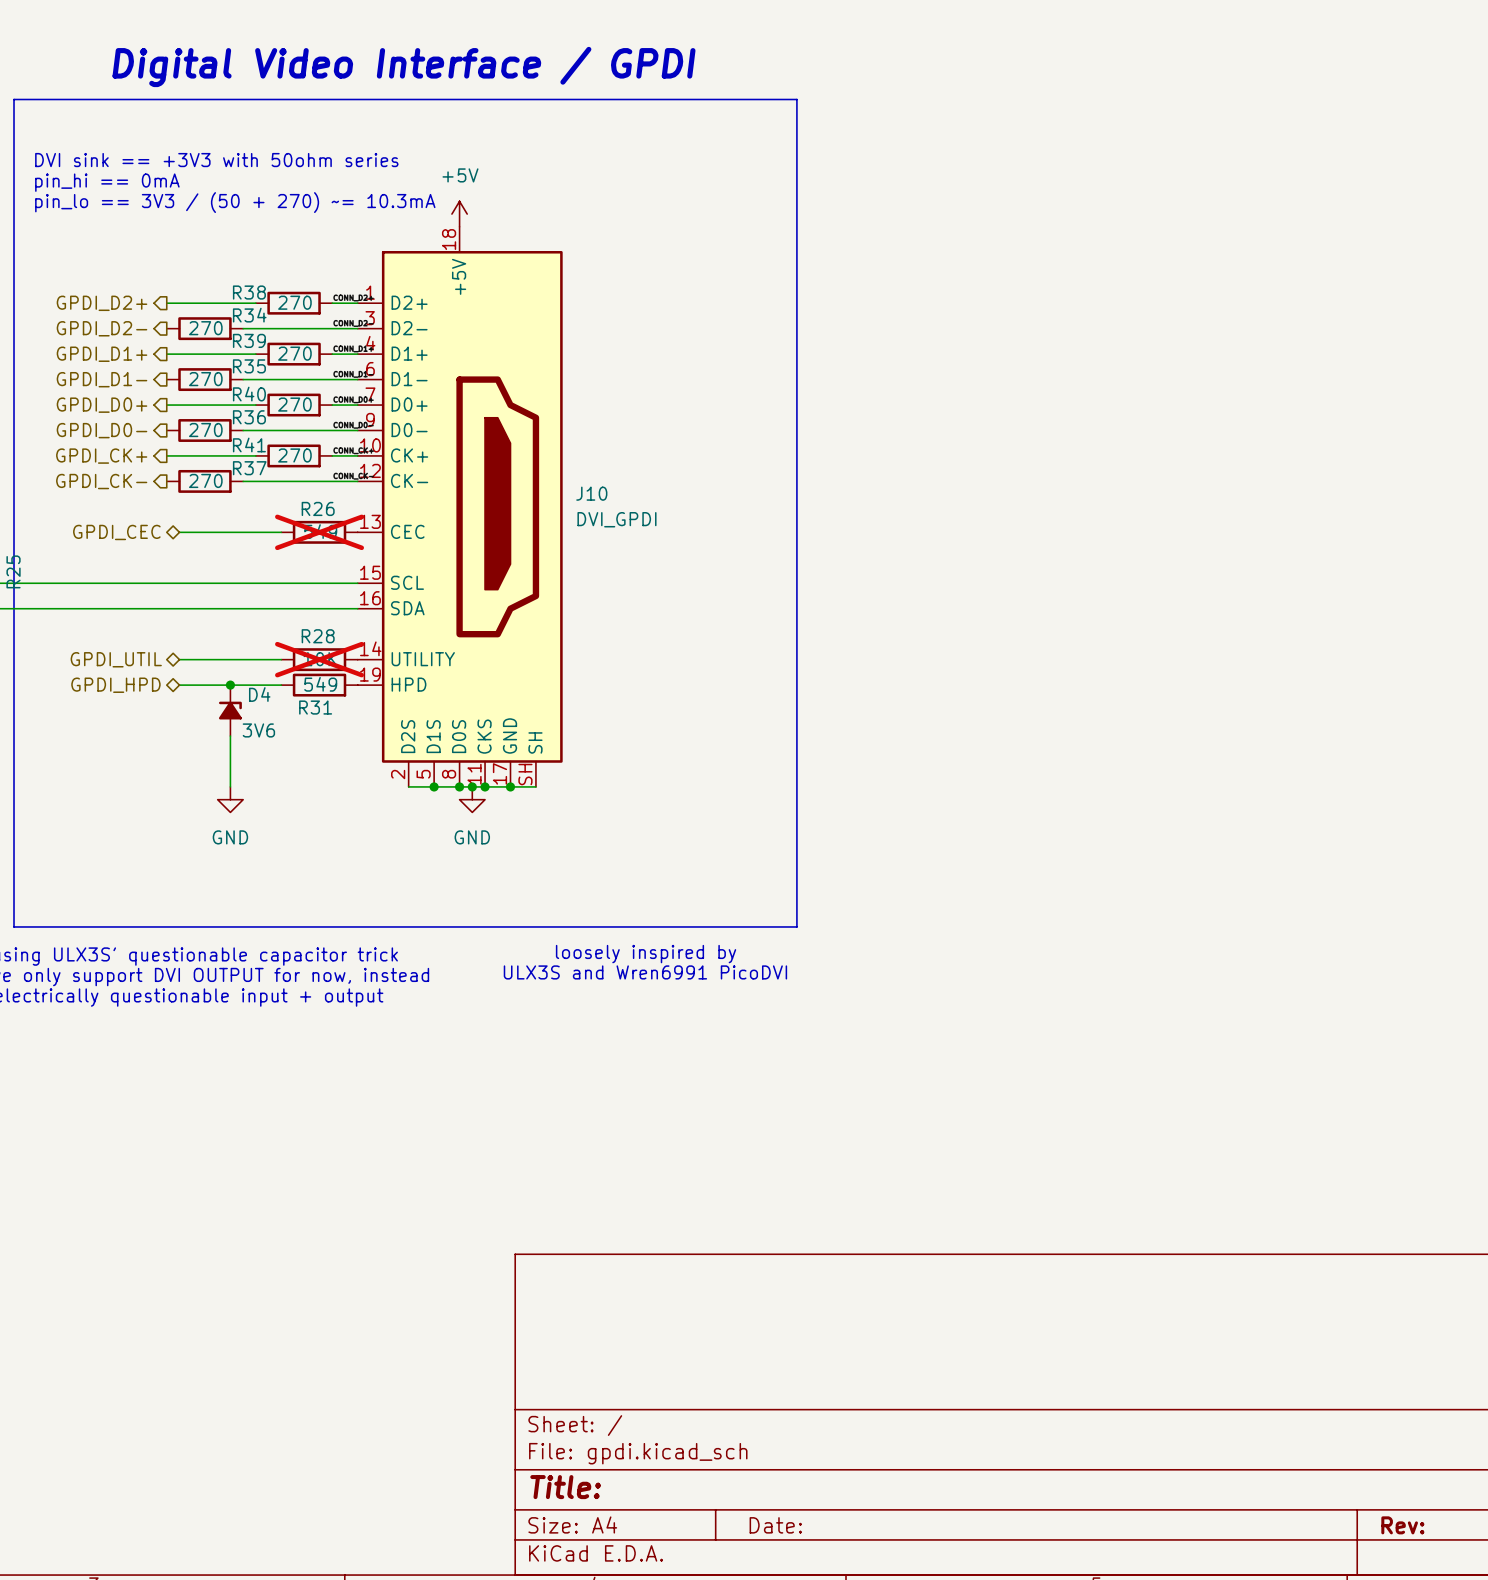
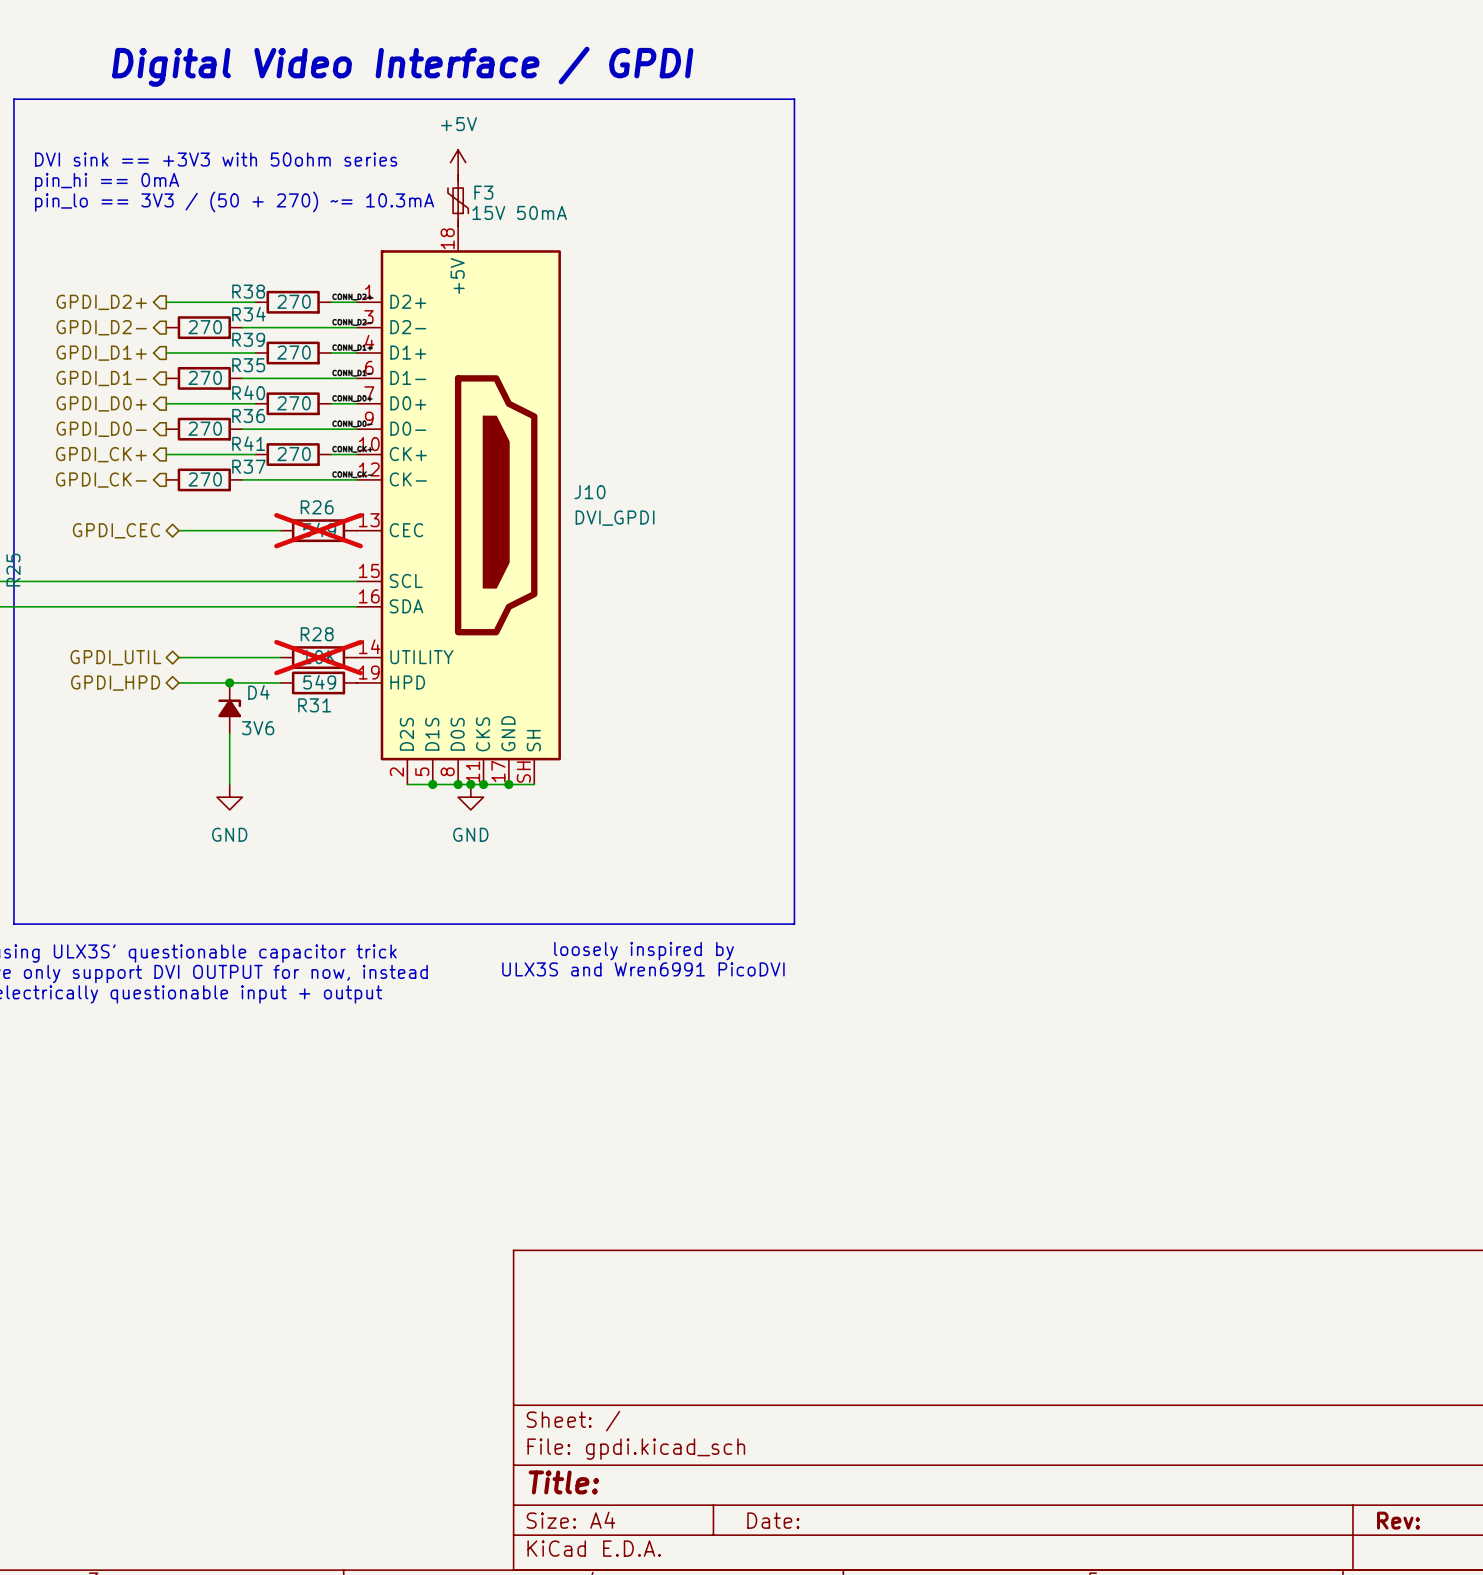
F3: none -> 15V 50mA (458, 200)
power symbol position: +5V (459, 214) -> +5V (458, 162)

